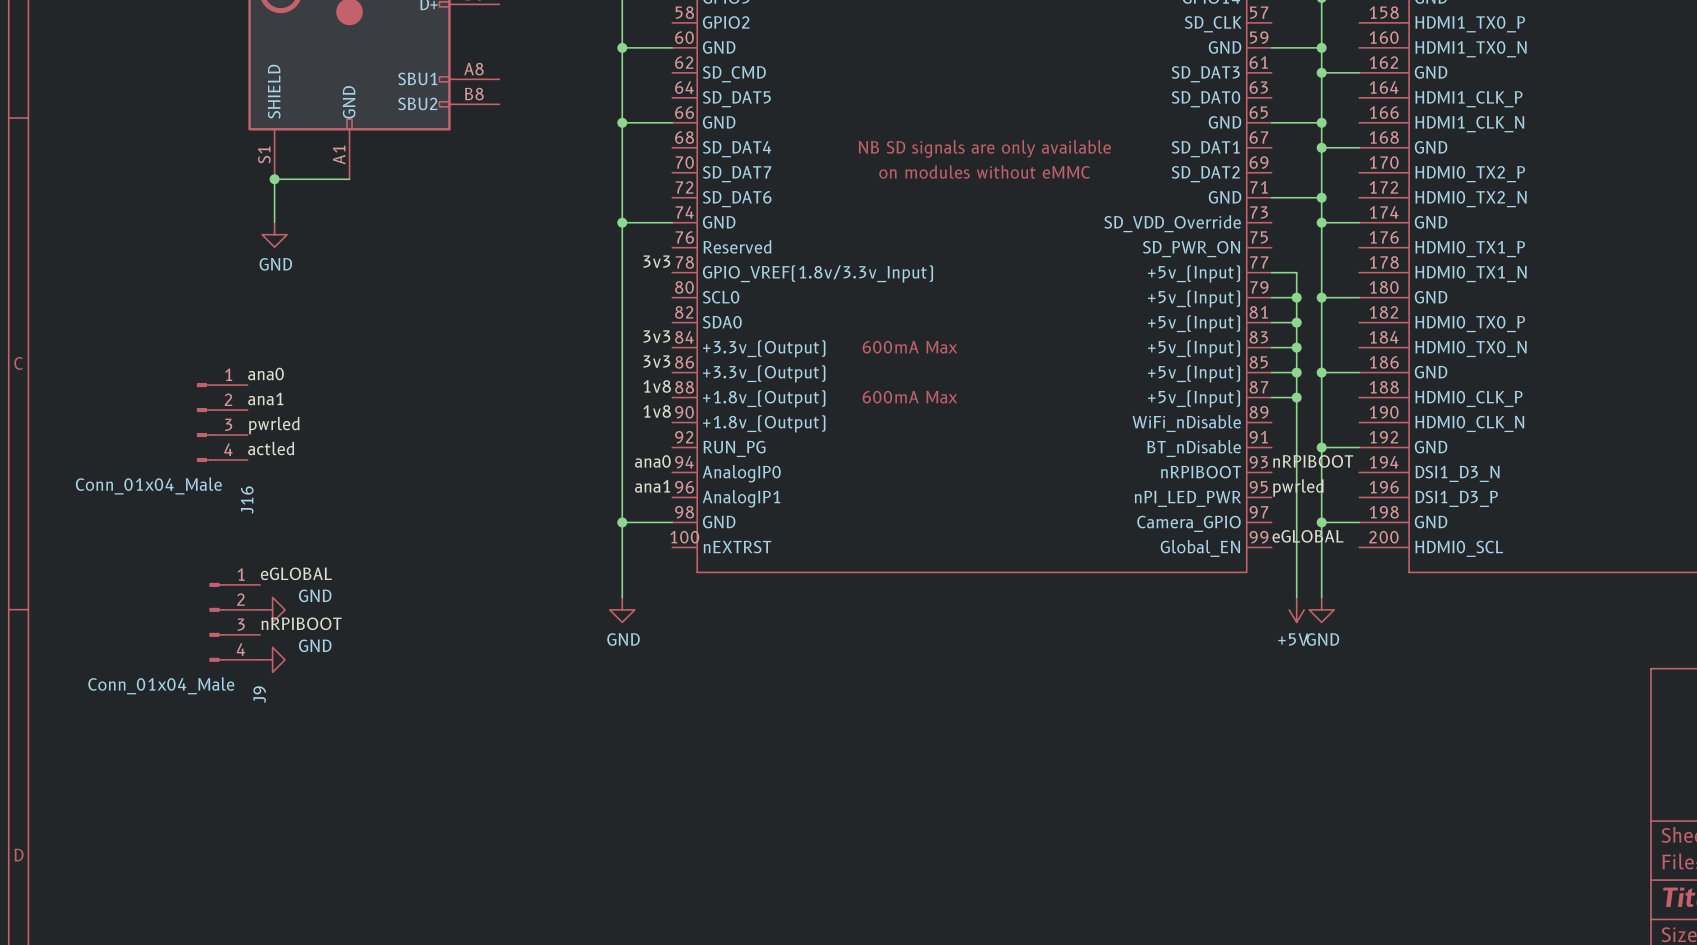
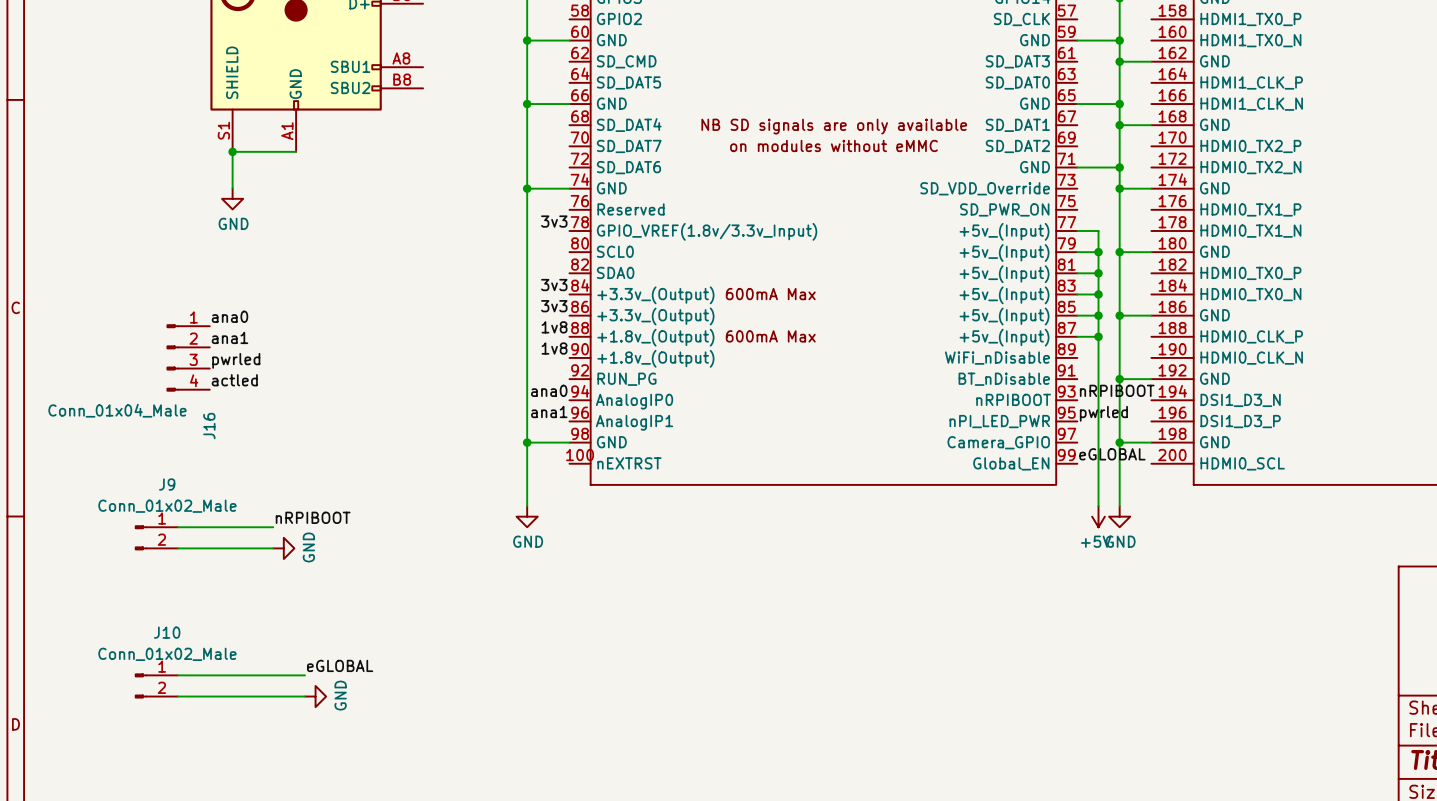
label position: eGLOBAL (296, 573) -> eGLOBAL (340, 665)
J9 symbol: [209, 582, 261, 662] -> [135, 525, 179, 551]
power symbol: GND (272, 609) -> none
wire: none -> (178, 527) (273, 527)
label position: nRPIBOOT (301, 623) -> nRPIBOOT (313, 517)
wire: none -> (178, 548) (273, 548)
power symbol: none -> GND (283, 548)
power symbol: GND (272, 659) -> none
J9 value: Conn_01x04_Male (161, 685) -> Conn_01x02_Male (167, 506)
J9 name position: J9 (259, 694) -> J9 (167, 484)
wire: none -> (178, 675) (304, 675)
J10: none -> Conn_01x02_Male (156, 685)
wire: none -> (178, 696) (304, 696)
power symbol: none -> GND (315, 696)

